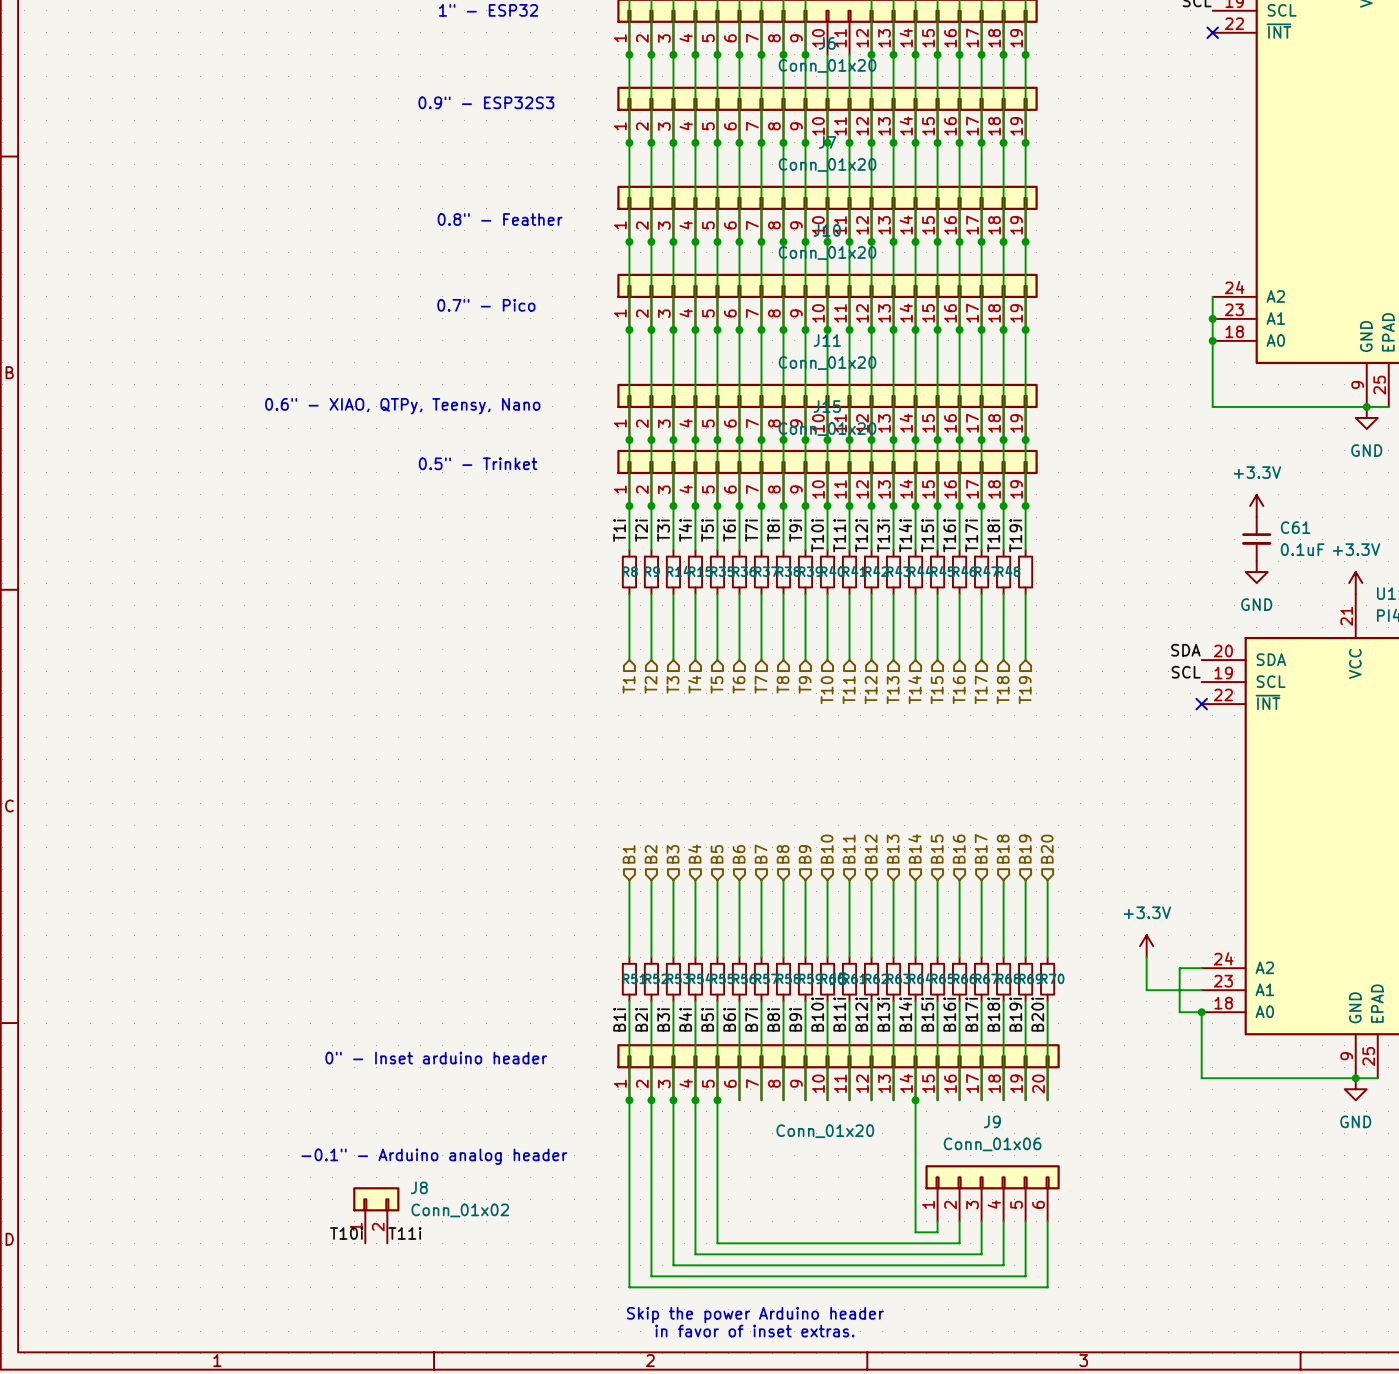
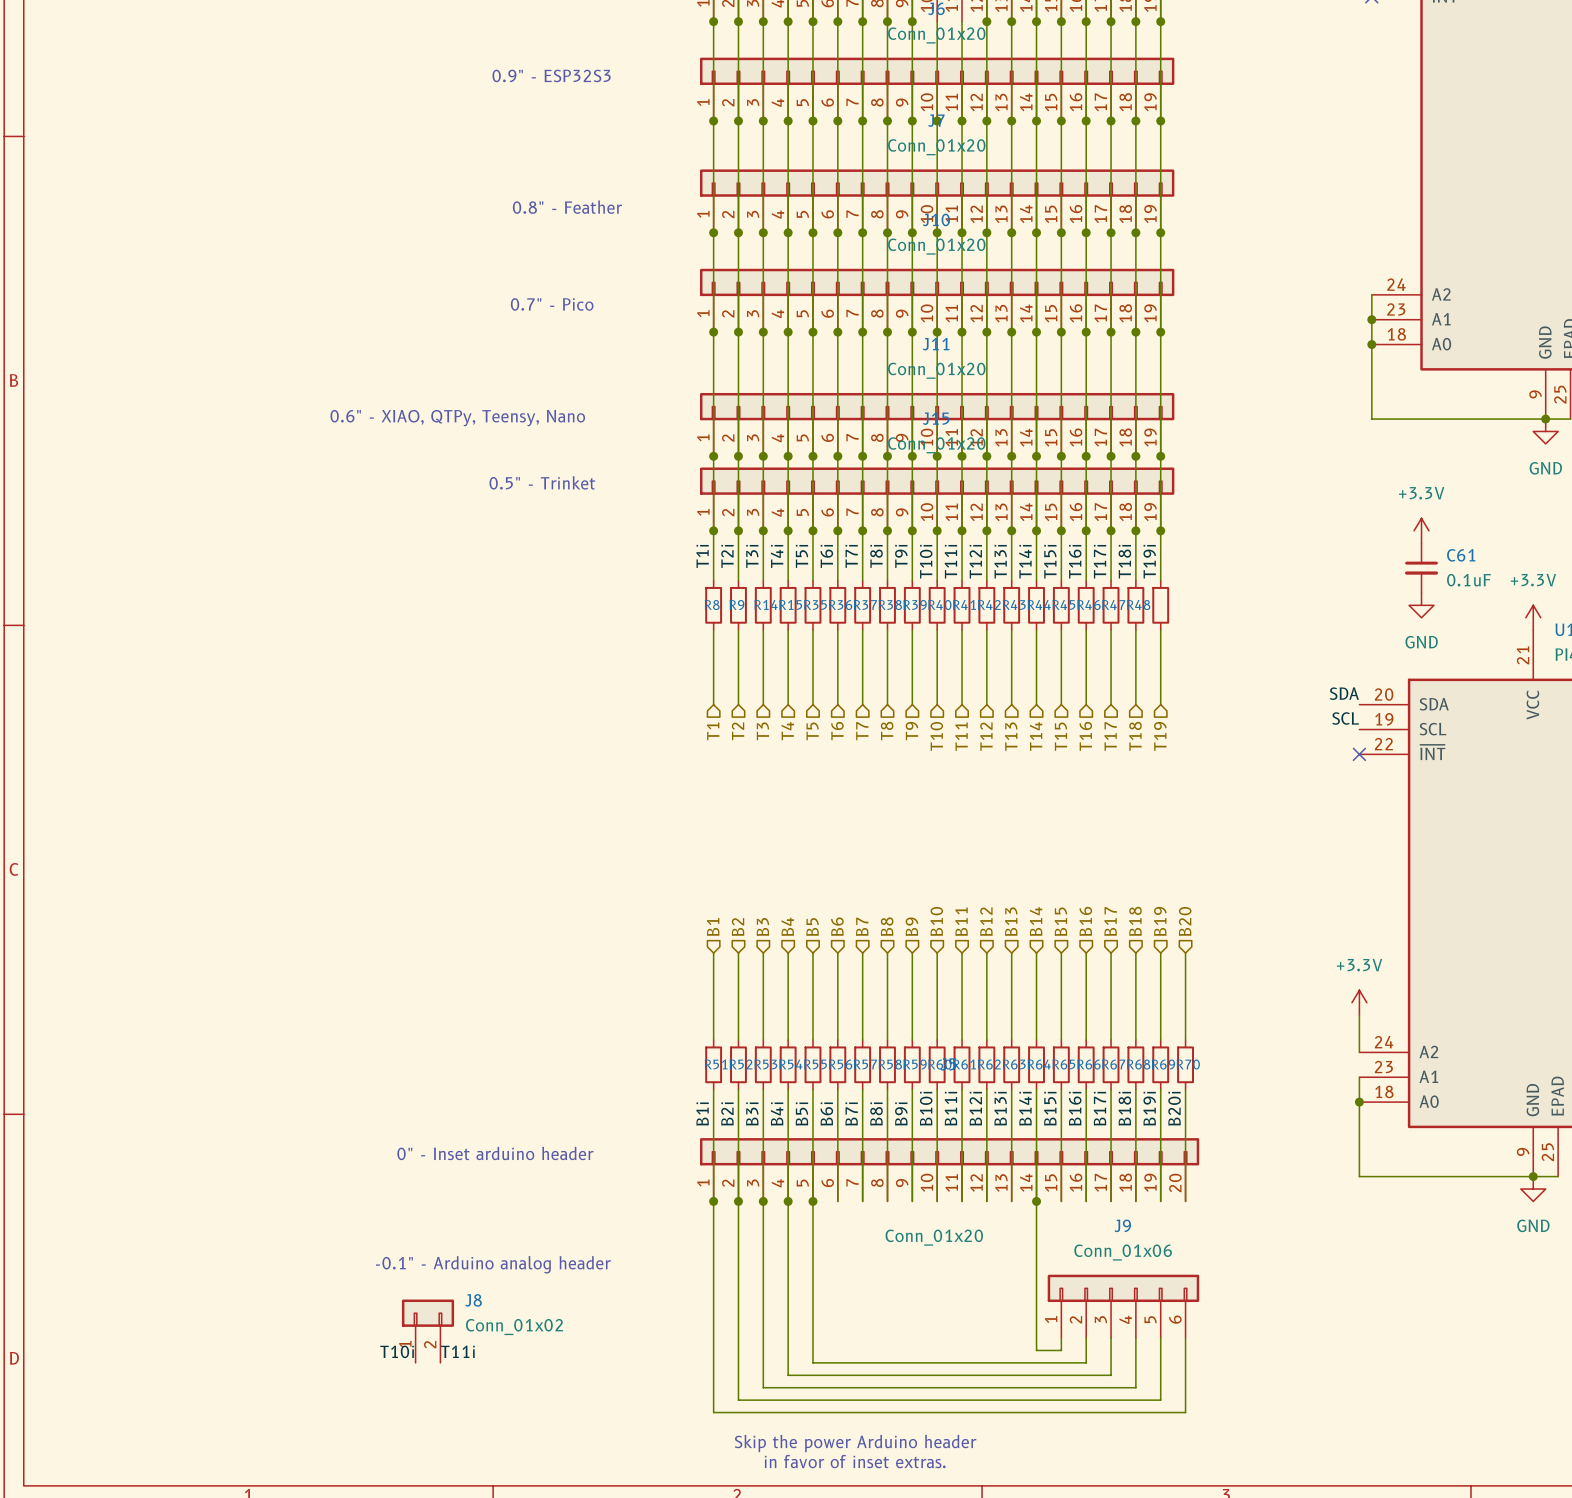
wire: none -> (1359, 1015) (1359, 1052)
power symbol position: +3.3V (1146, 946) -> +3.3V (1359, 1002)
wire: (1146, 957) (1146, 990) (1201, 990) -> none
wire: (1201, 968) (1179, 968) (1179, 1012) (1201, 1012) -> (1359, 1077) (1359, 1102)

